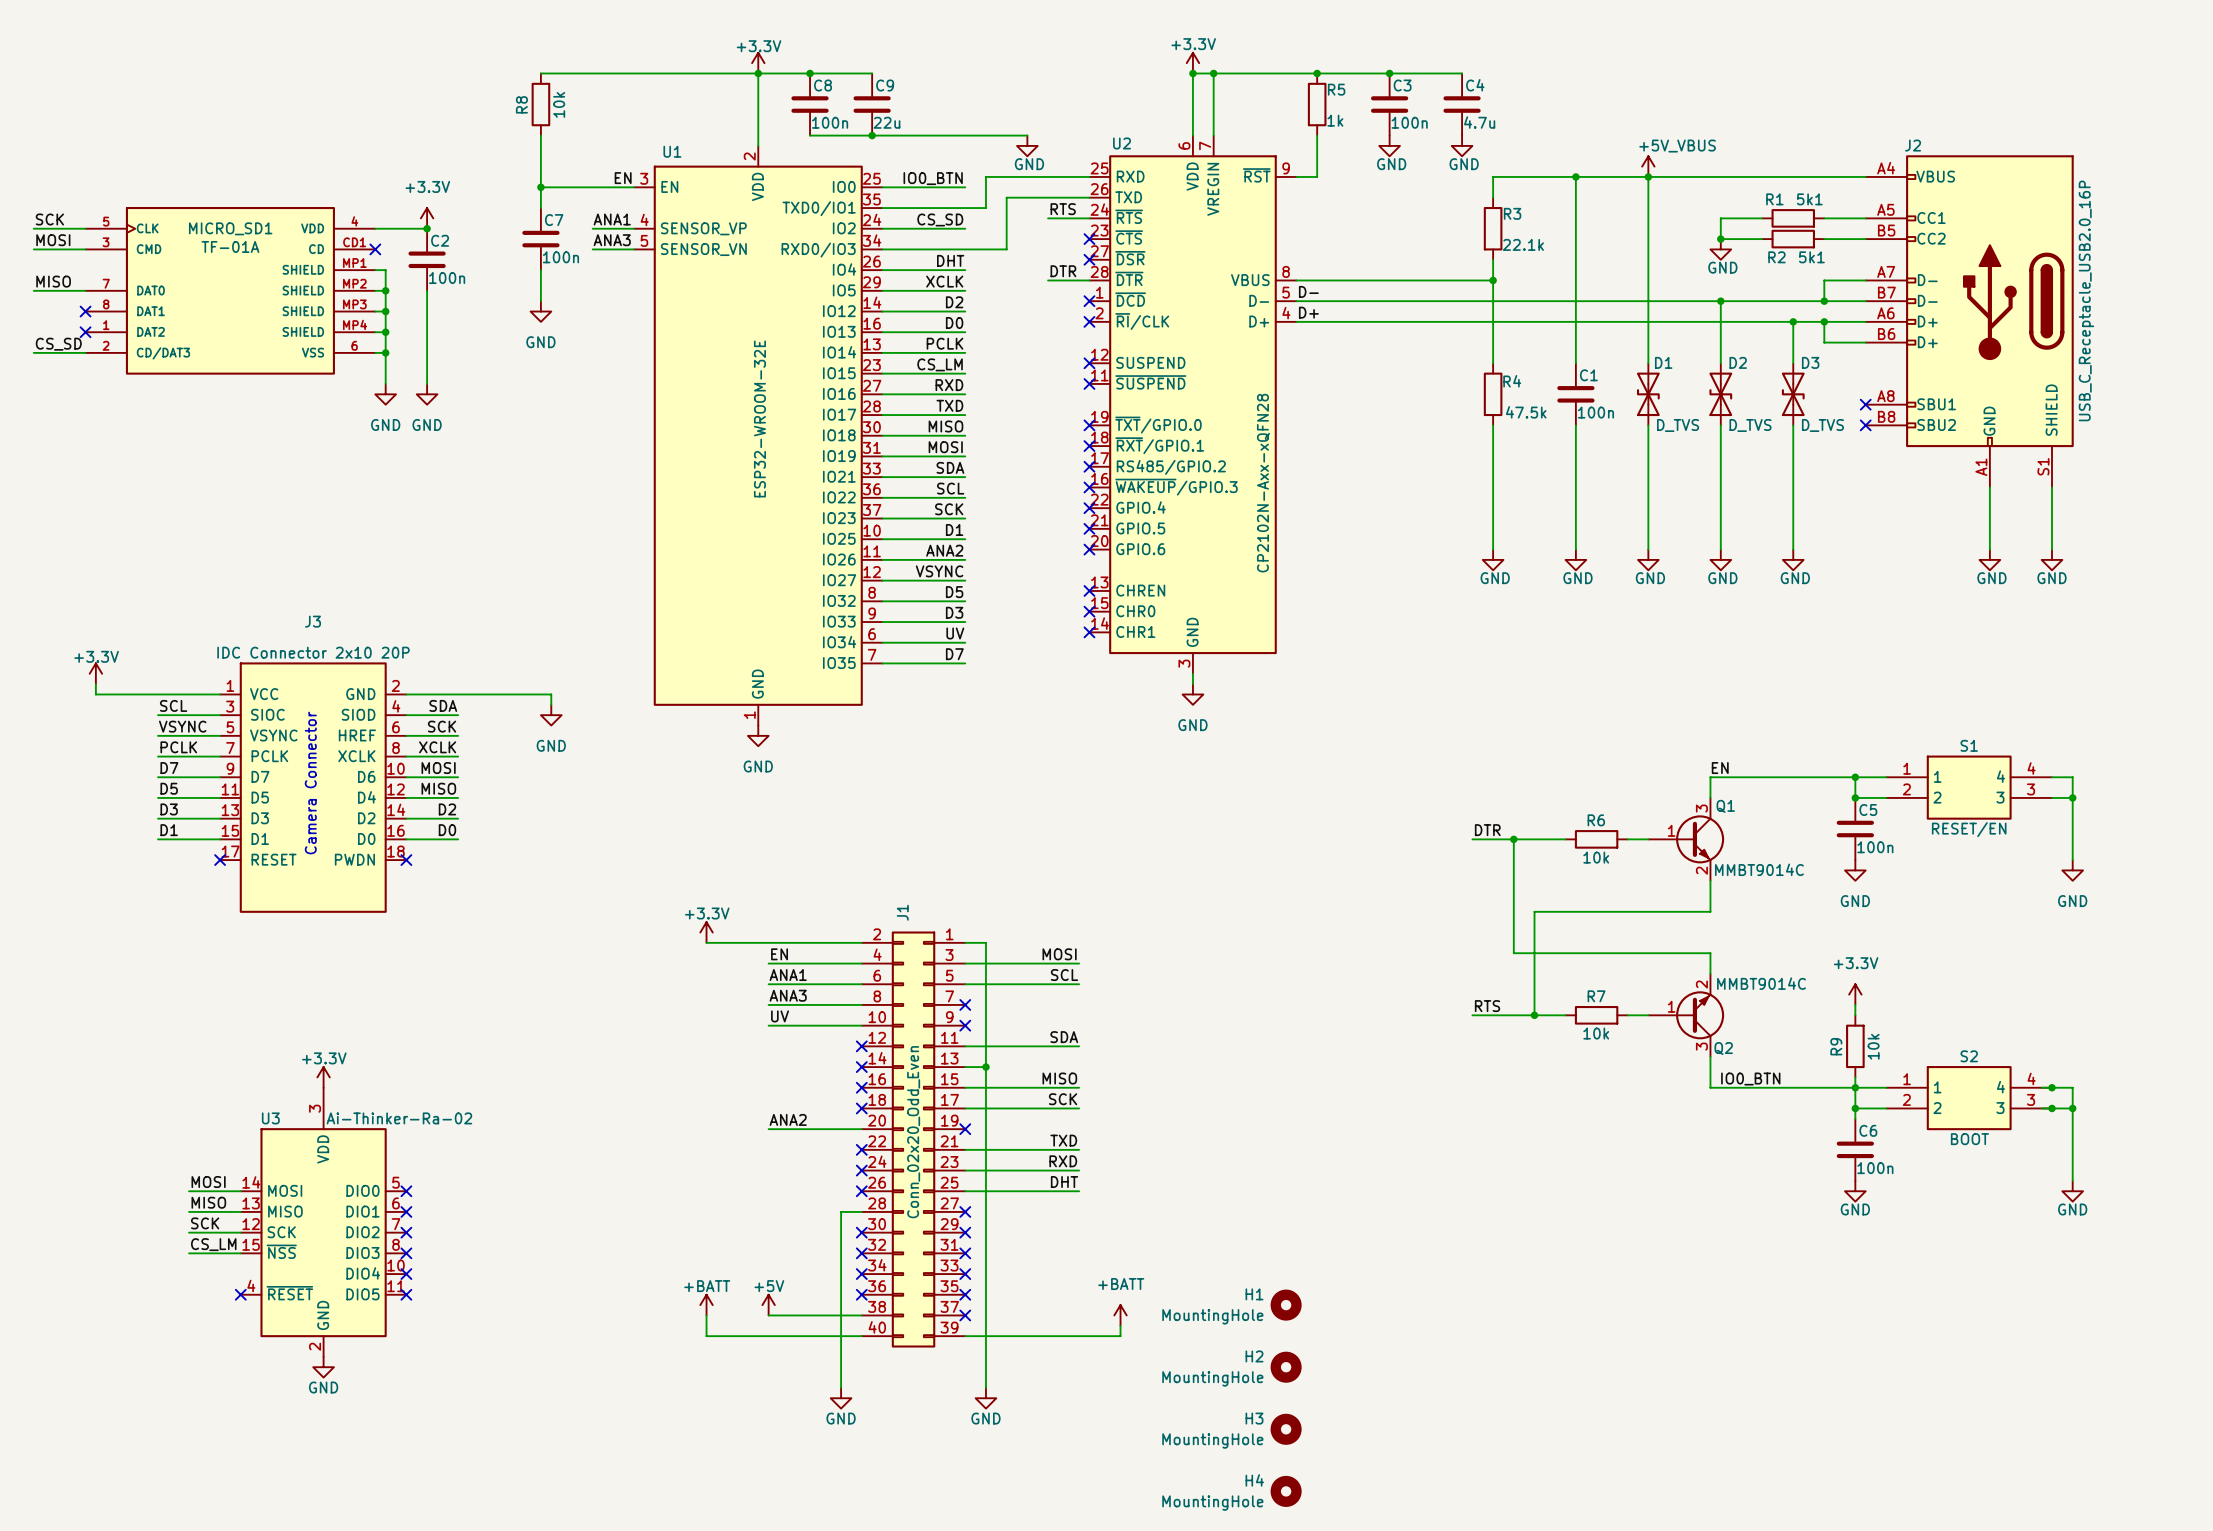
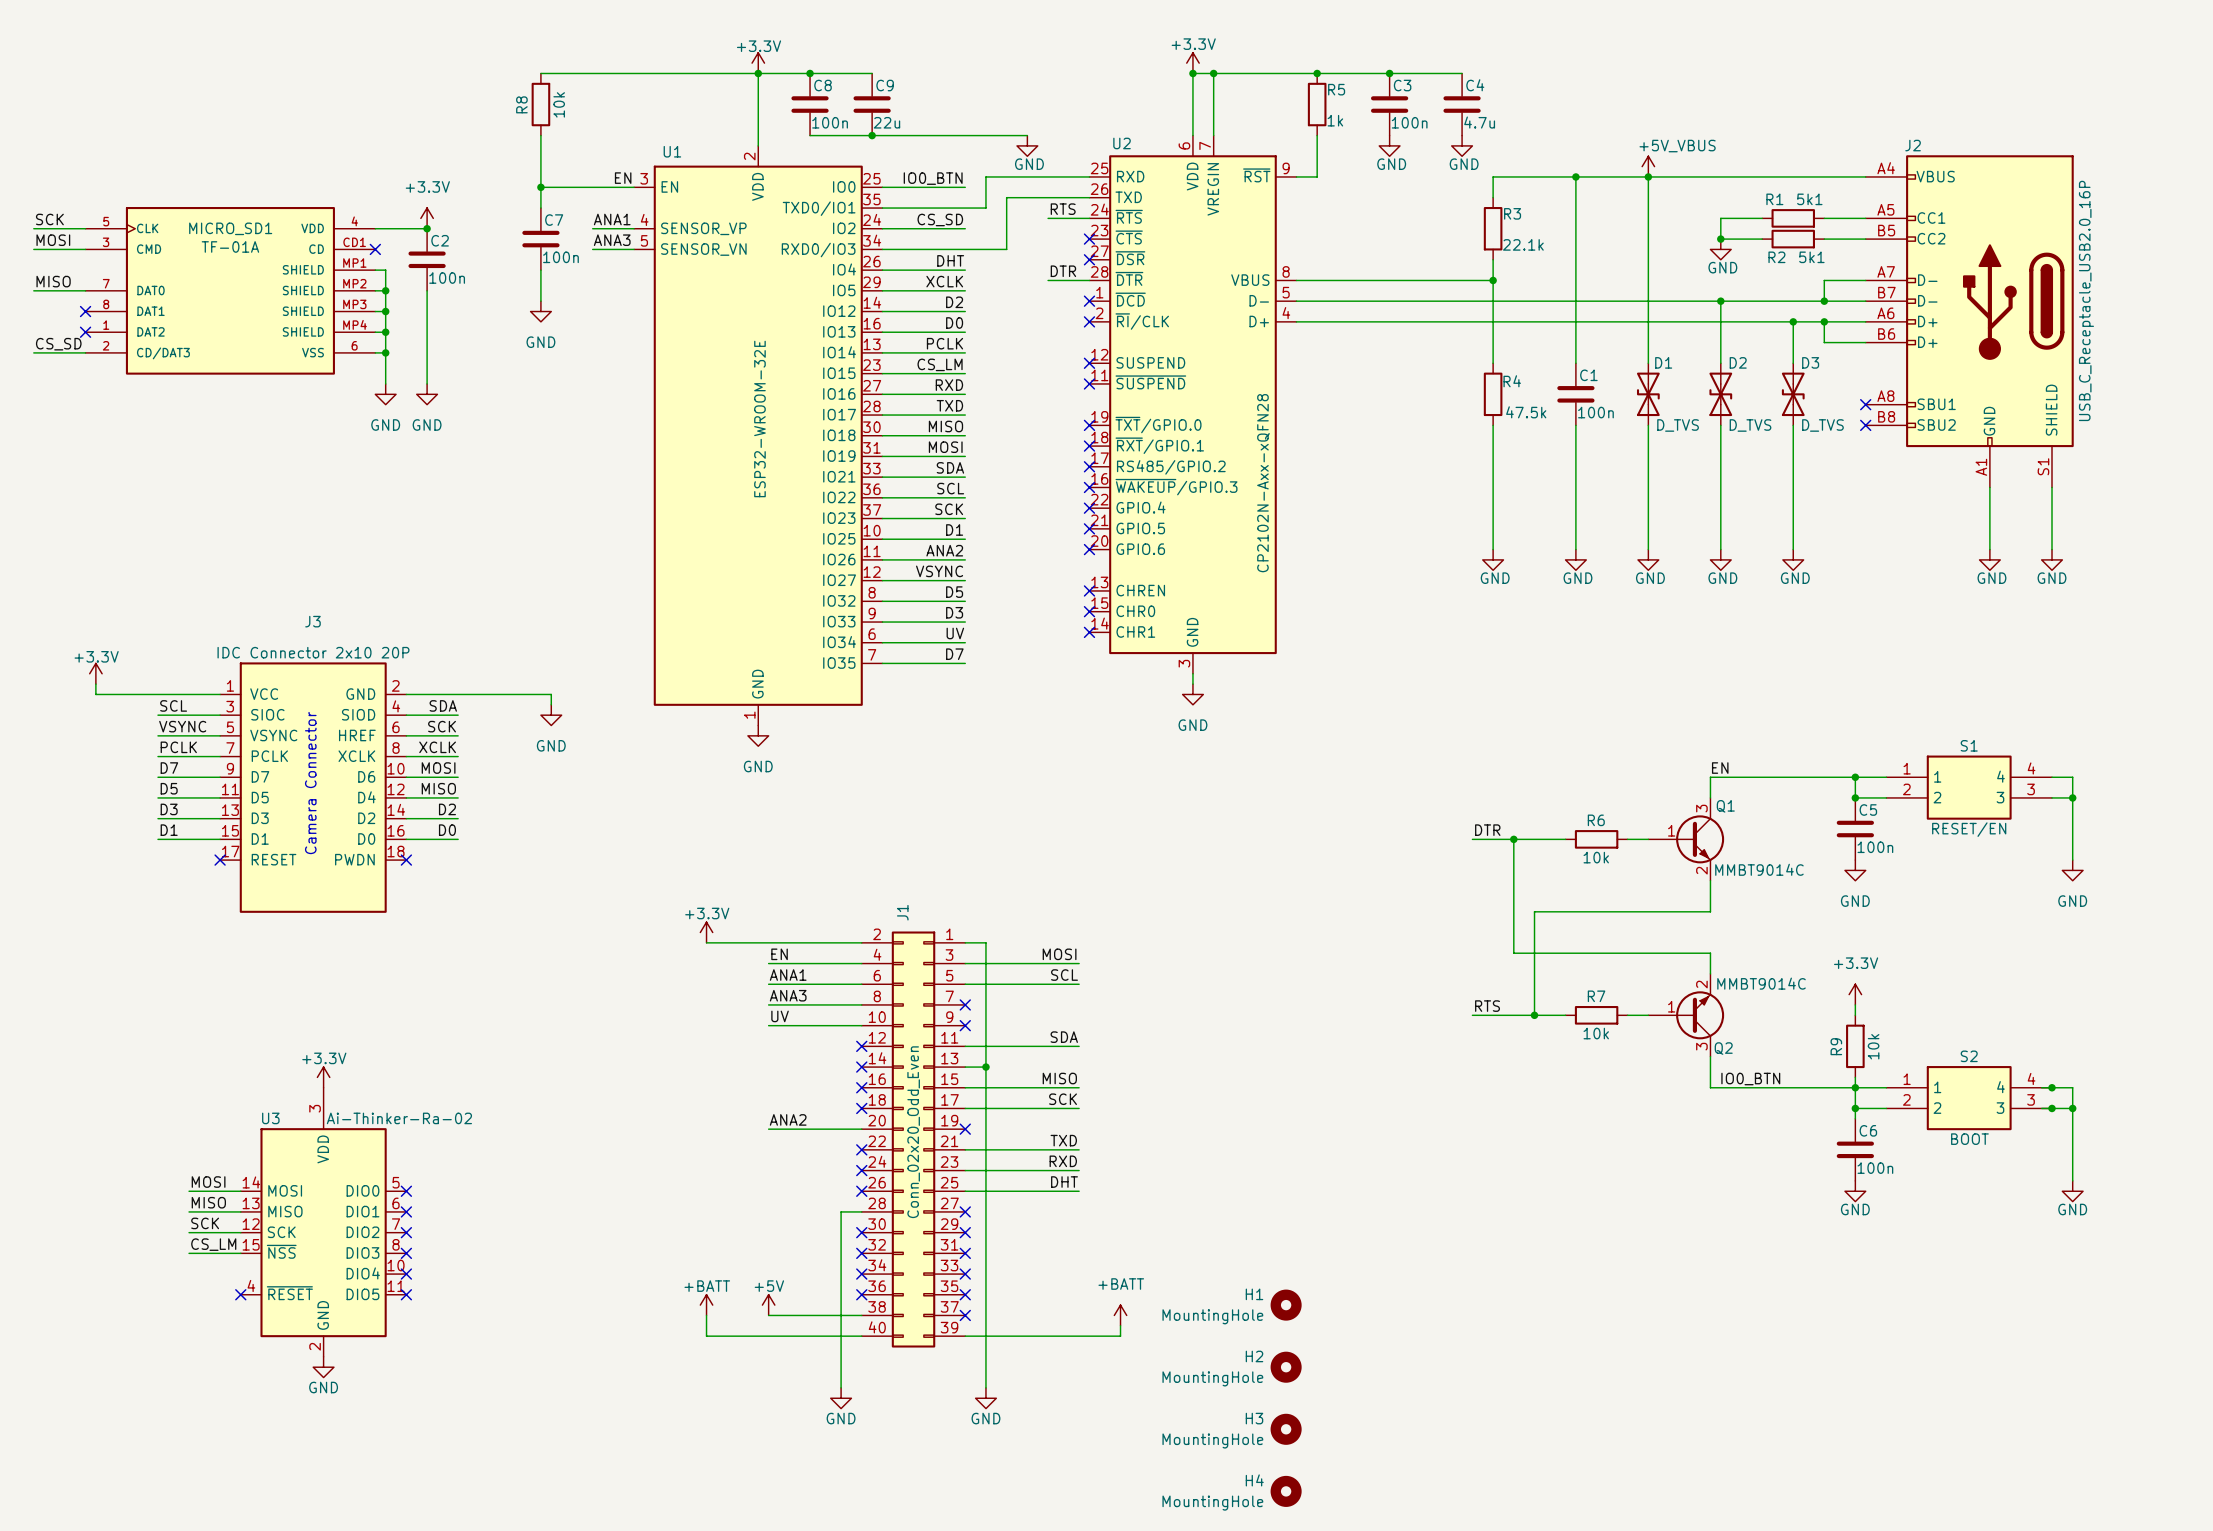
label: D- (1308, 291) -> none
label: D+ (1308, 312) -> none

